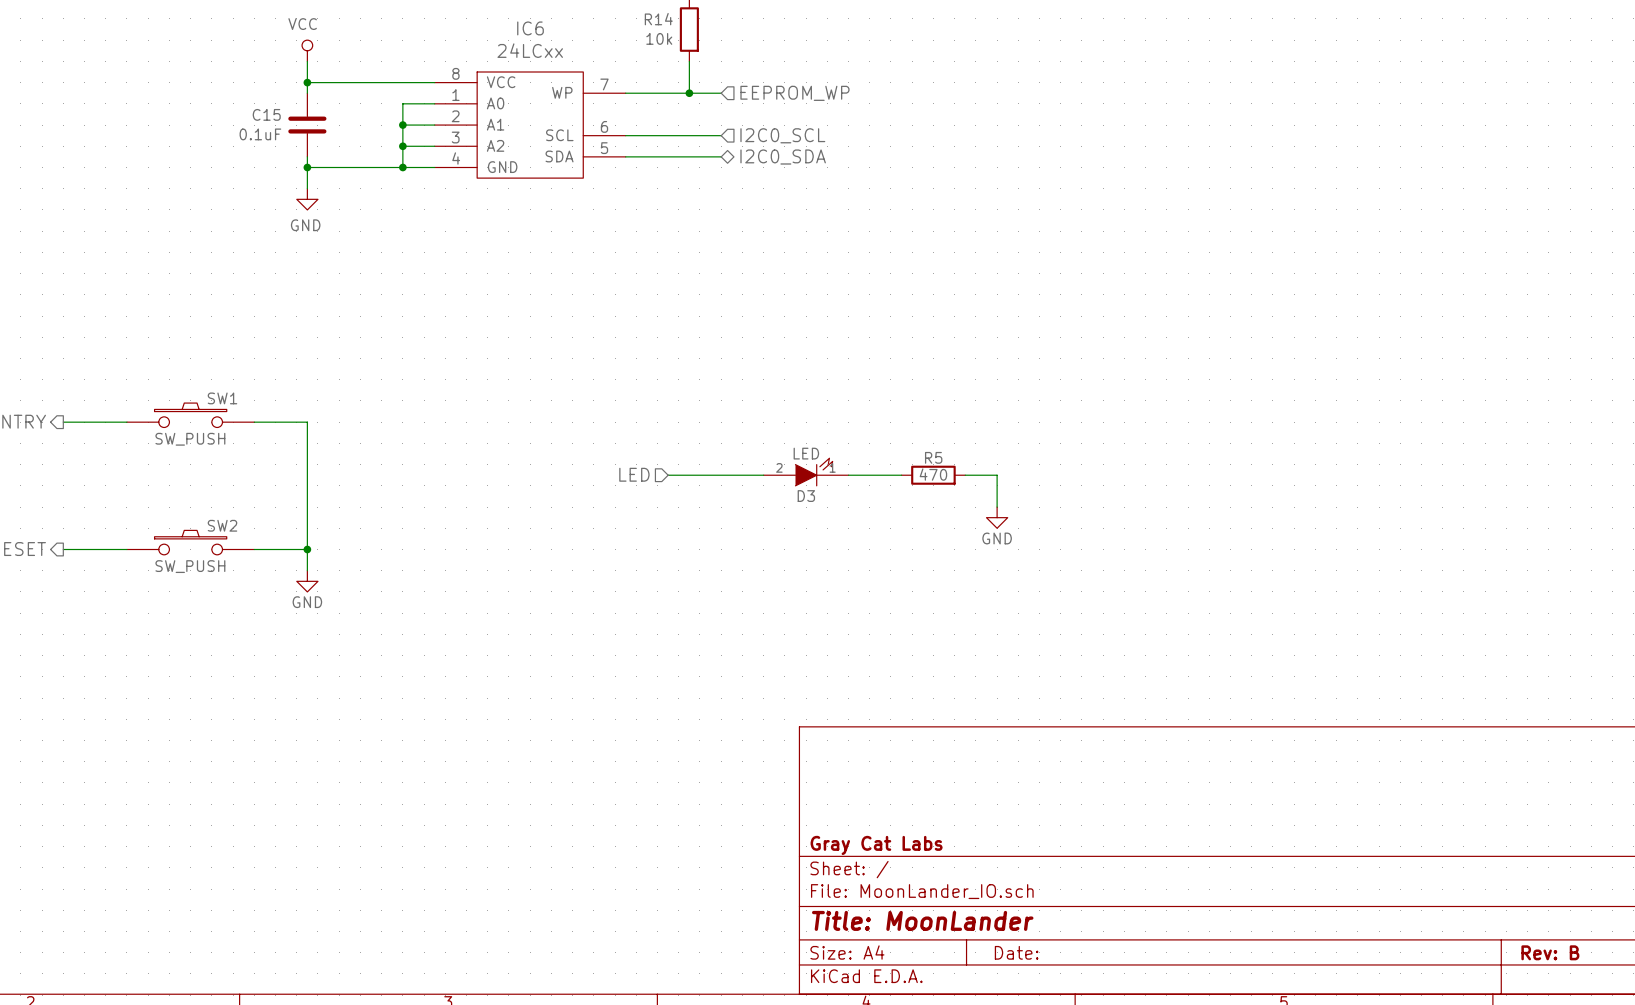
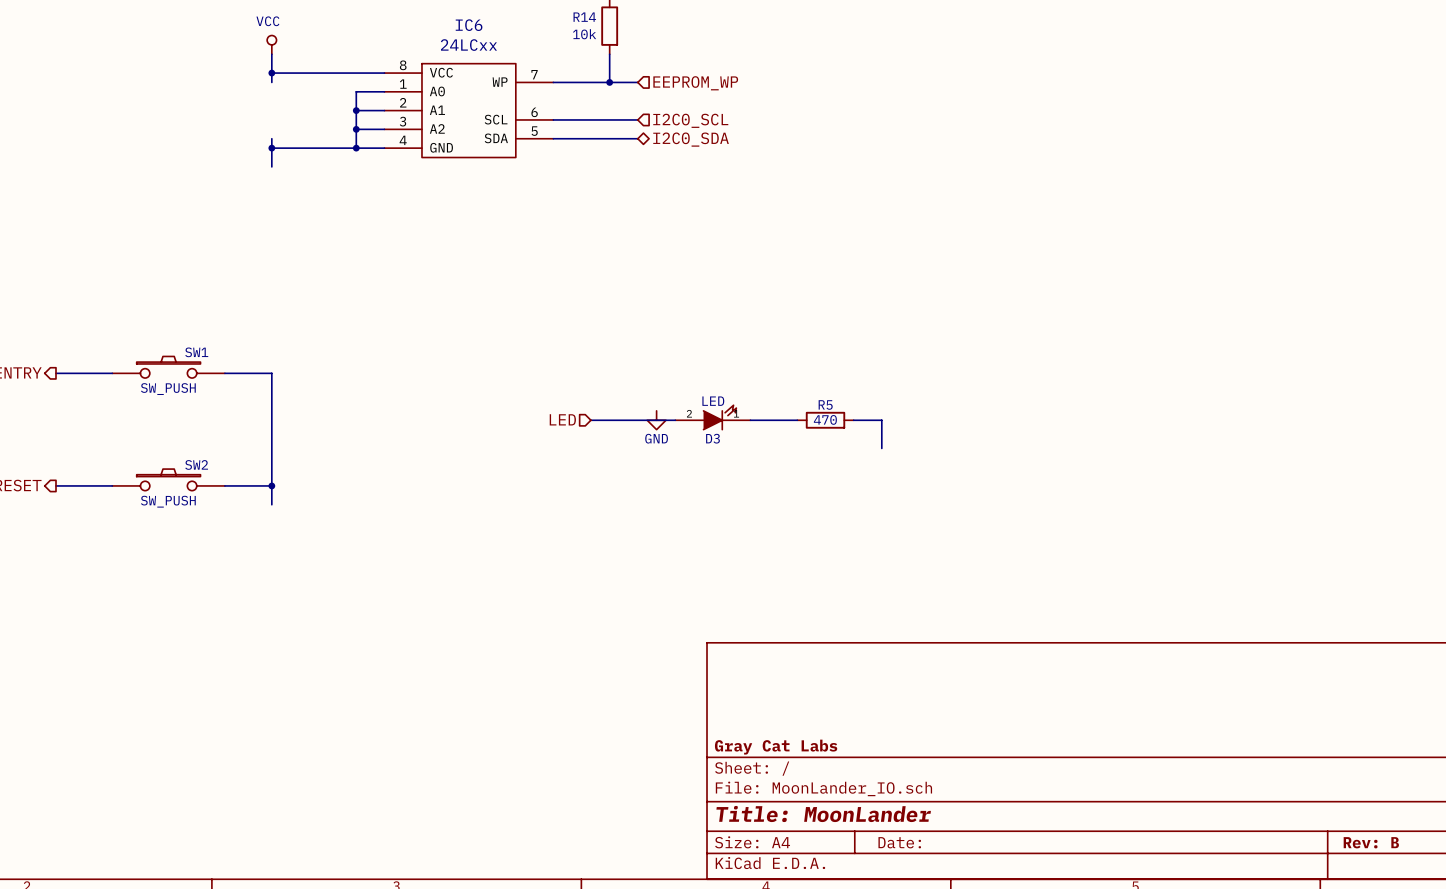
C15: 0.1uF (307, 125) -> none
power symbol: GND (307, 199) -> none
power symbol: none -> GND (656, 420)
power symbol: GND (997, 517) -> none
power symbol: GND (307, 581) -> none

